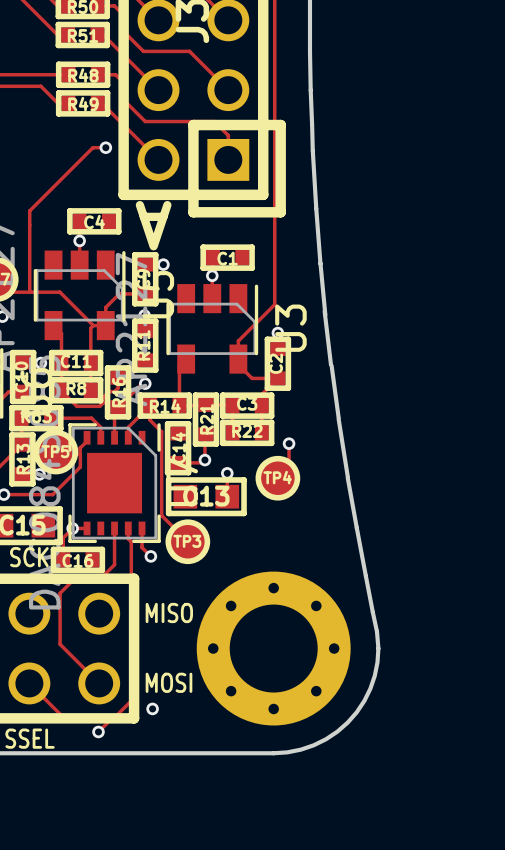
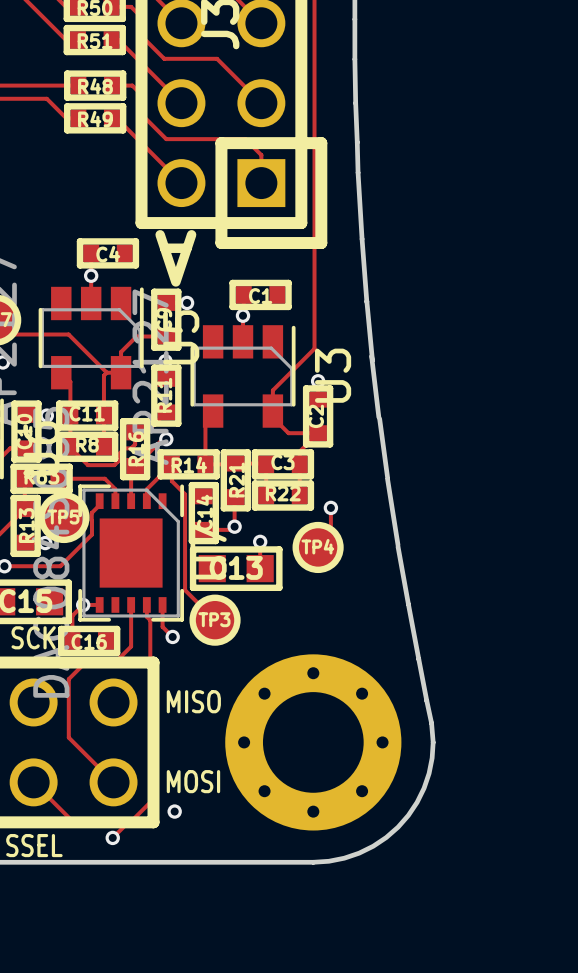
track: (105, 147) (92, 147) (29, 210) (29, 292) -> none
via: (105, 147) -> none

